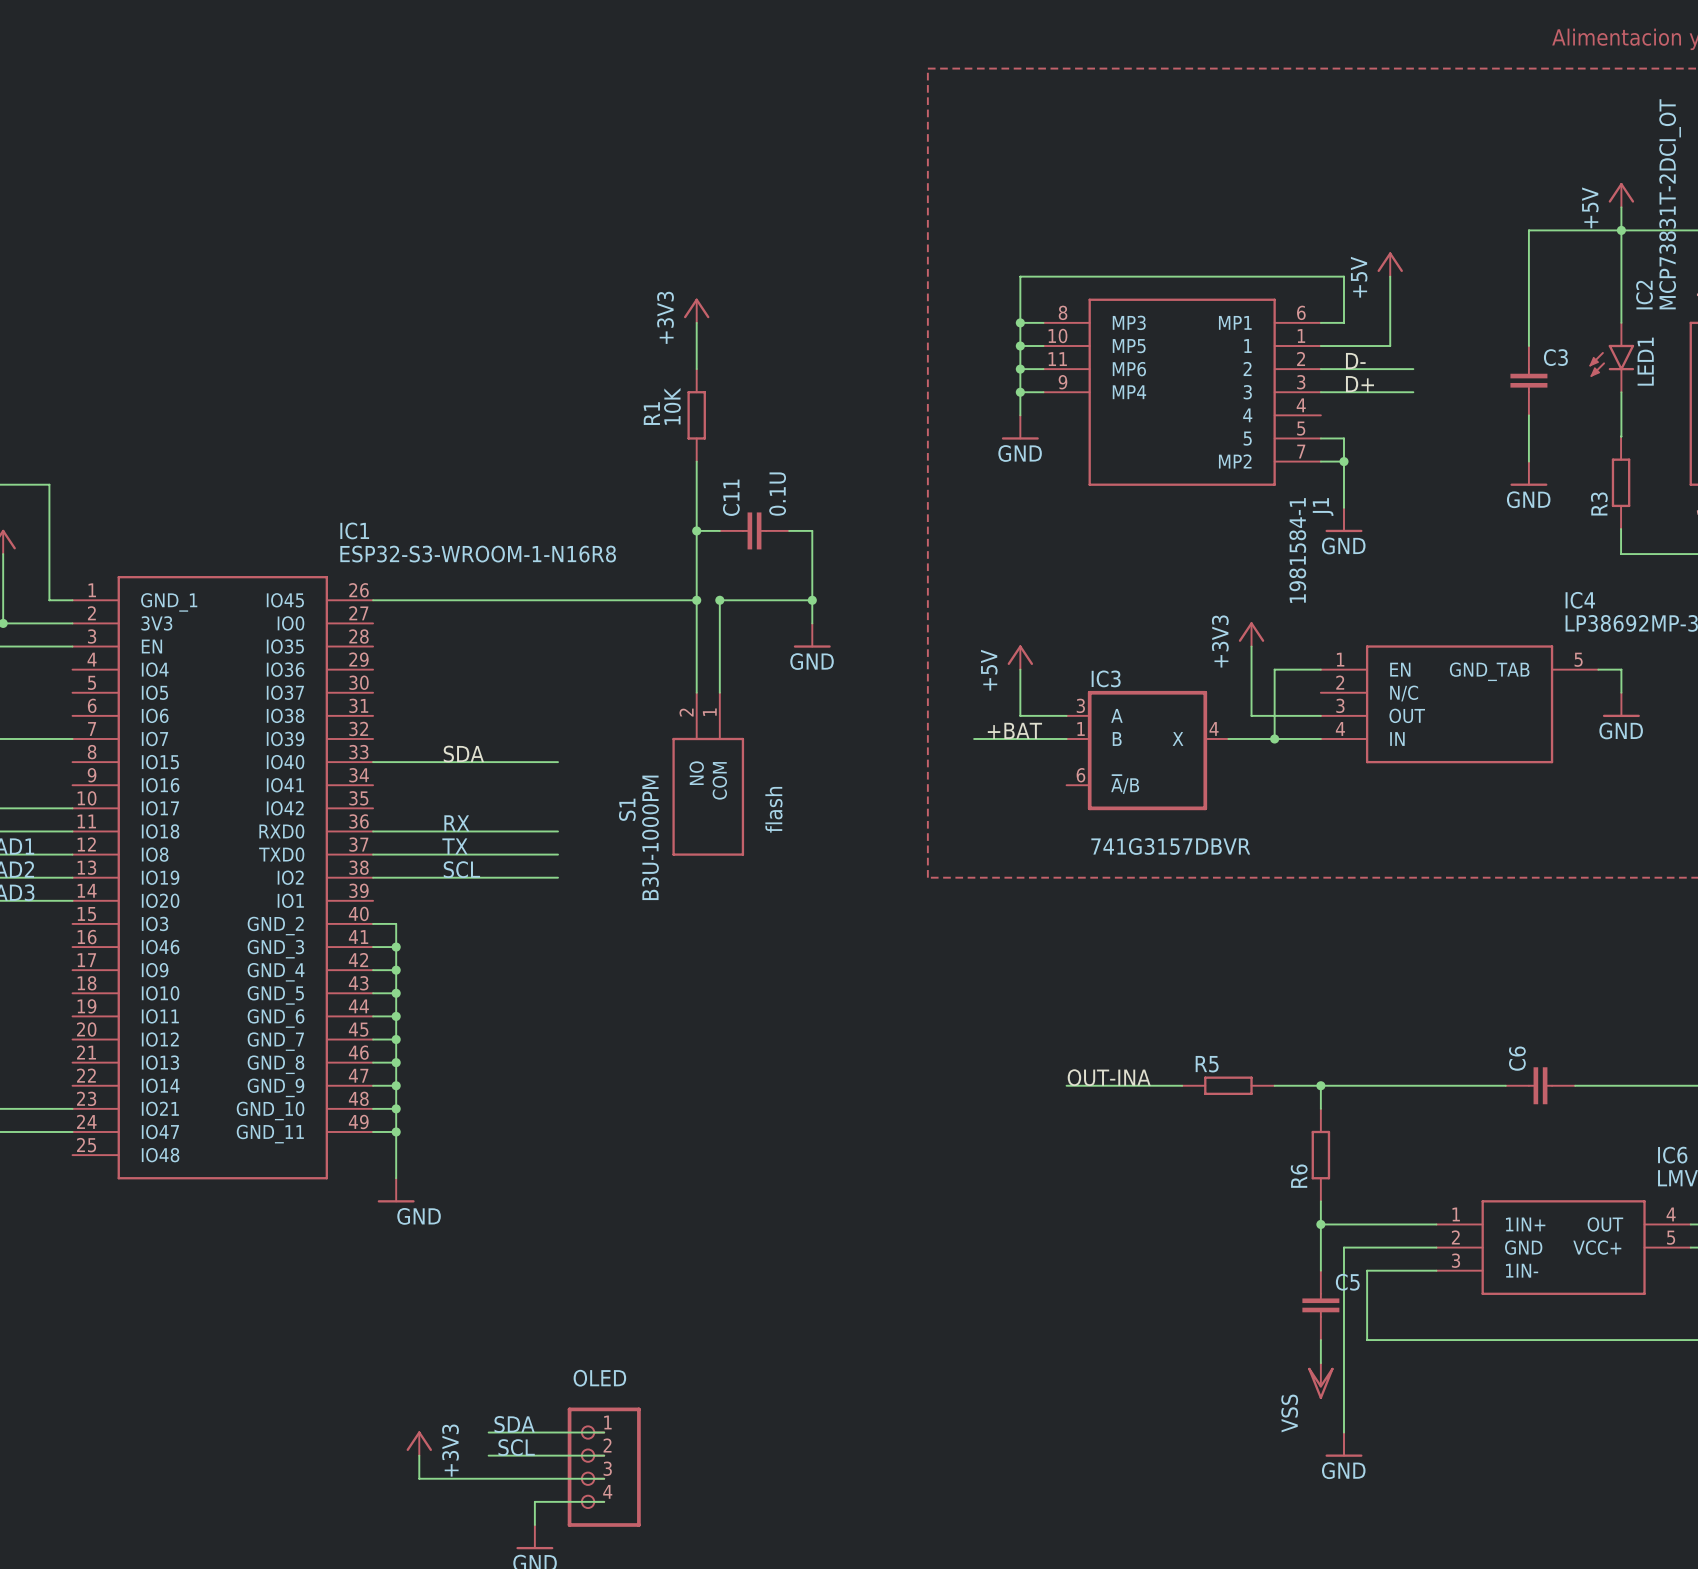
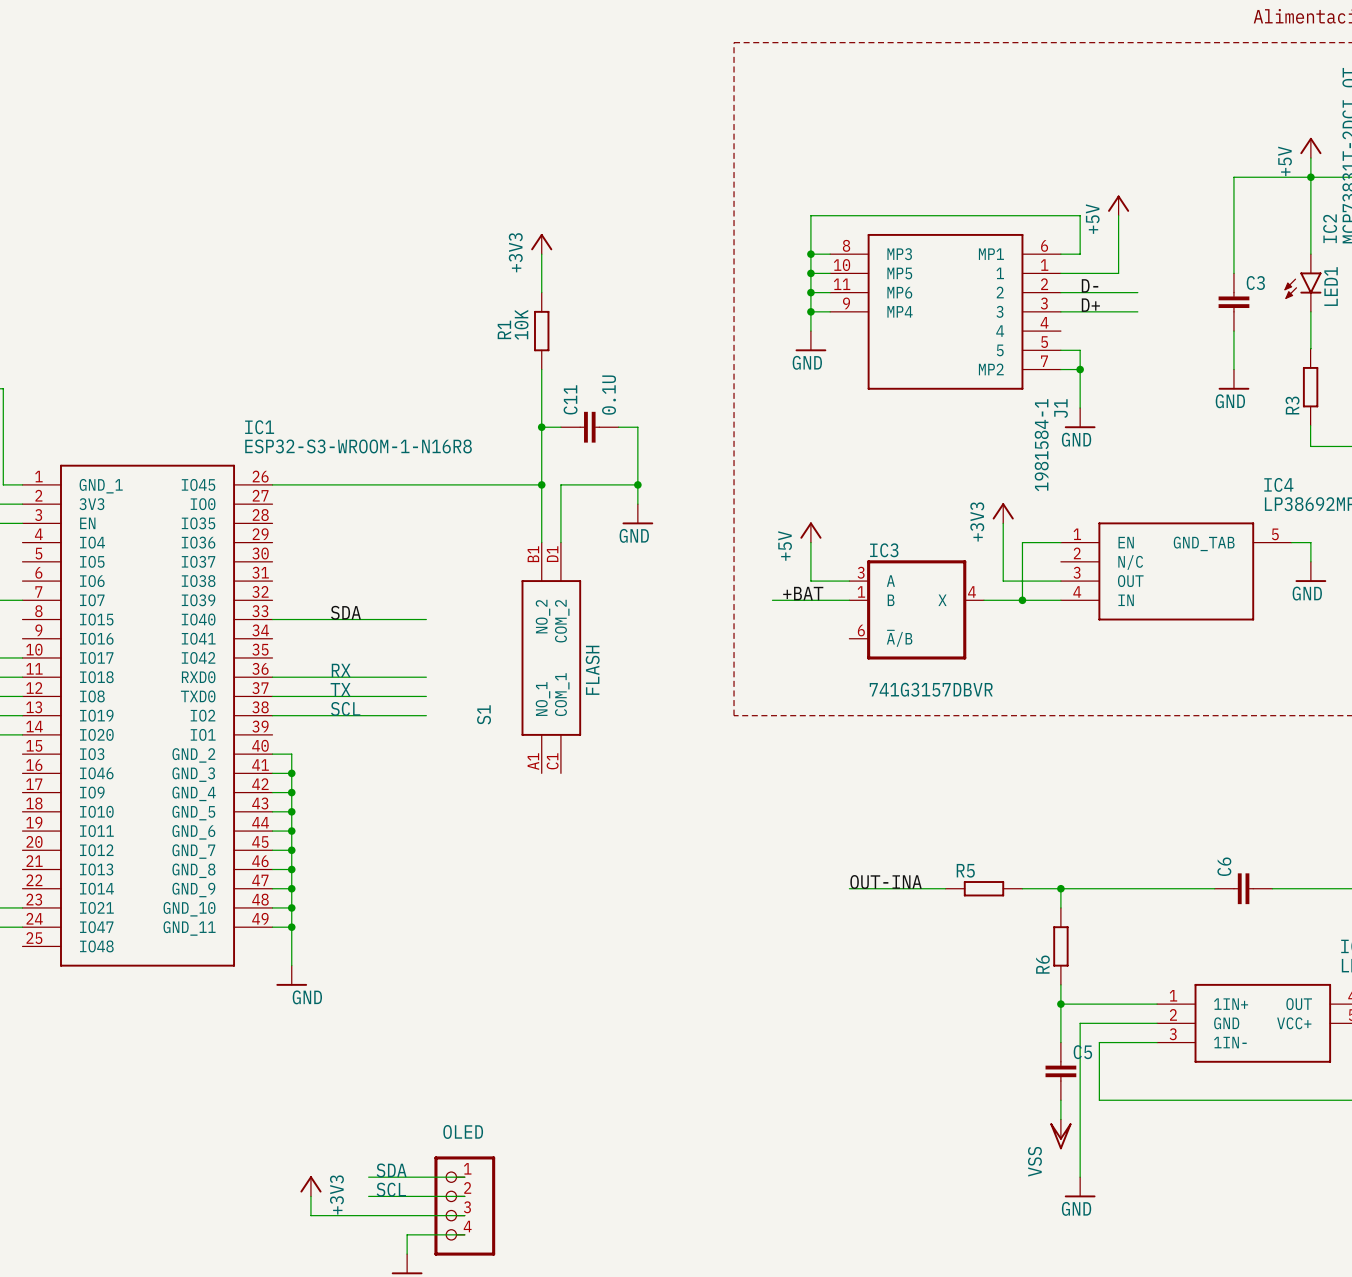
junction: (719, 600) -> none
S1 symbol: [672, 692, 745, 856] -> [521, 542, 582, 774]
S1 name position: S1 (627, 809) -> S1 (484, 714)
text: flash (773, 809) -> none
text: none -> FLASH (592, 670)
S1 value: B3U-1000PM (650, 837) -> none

